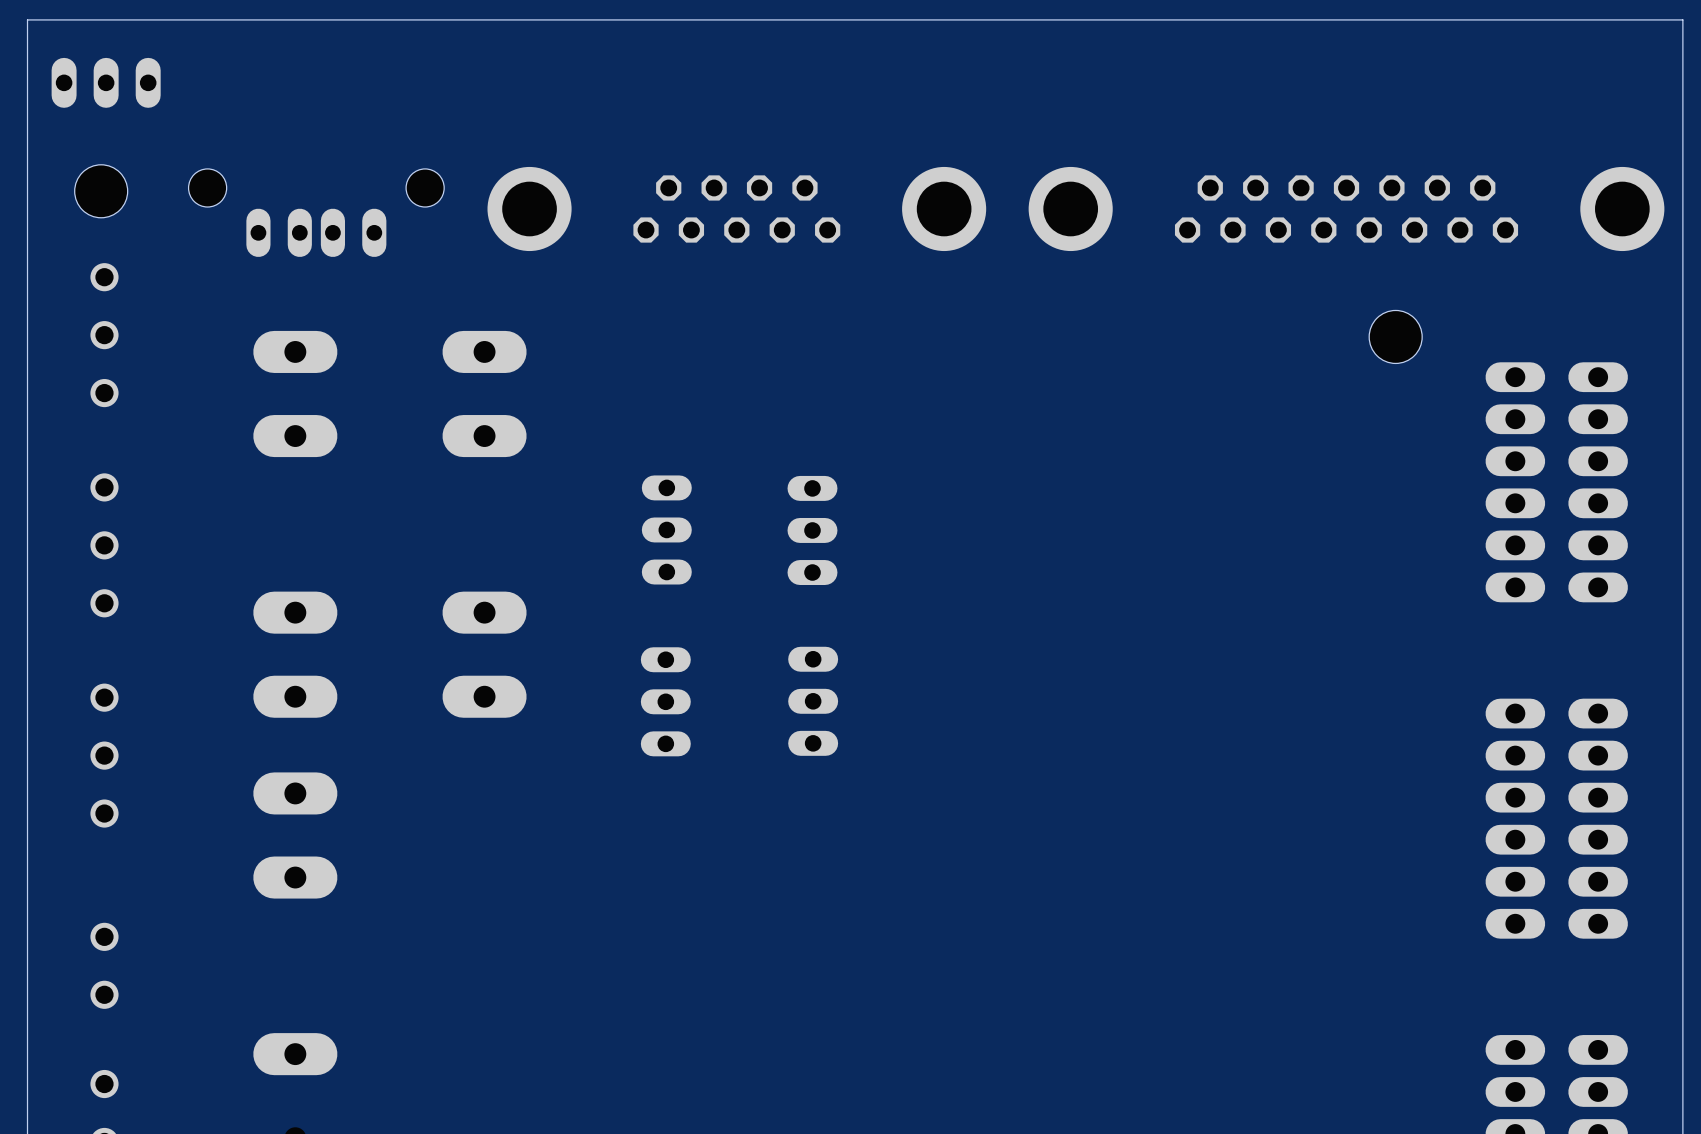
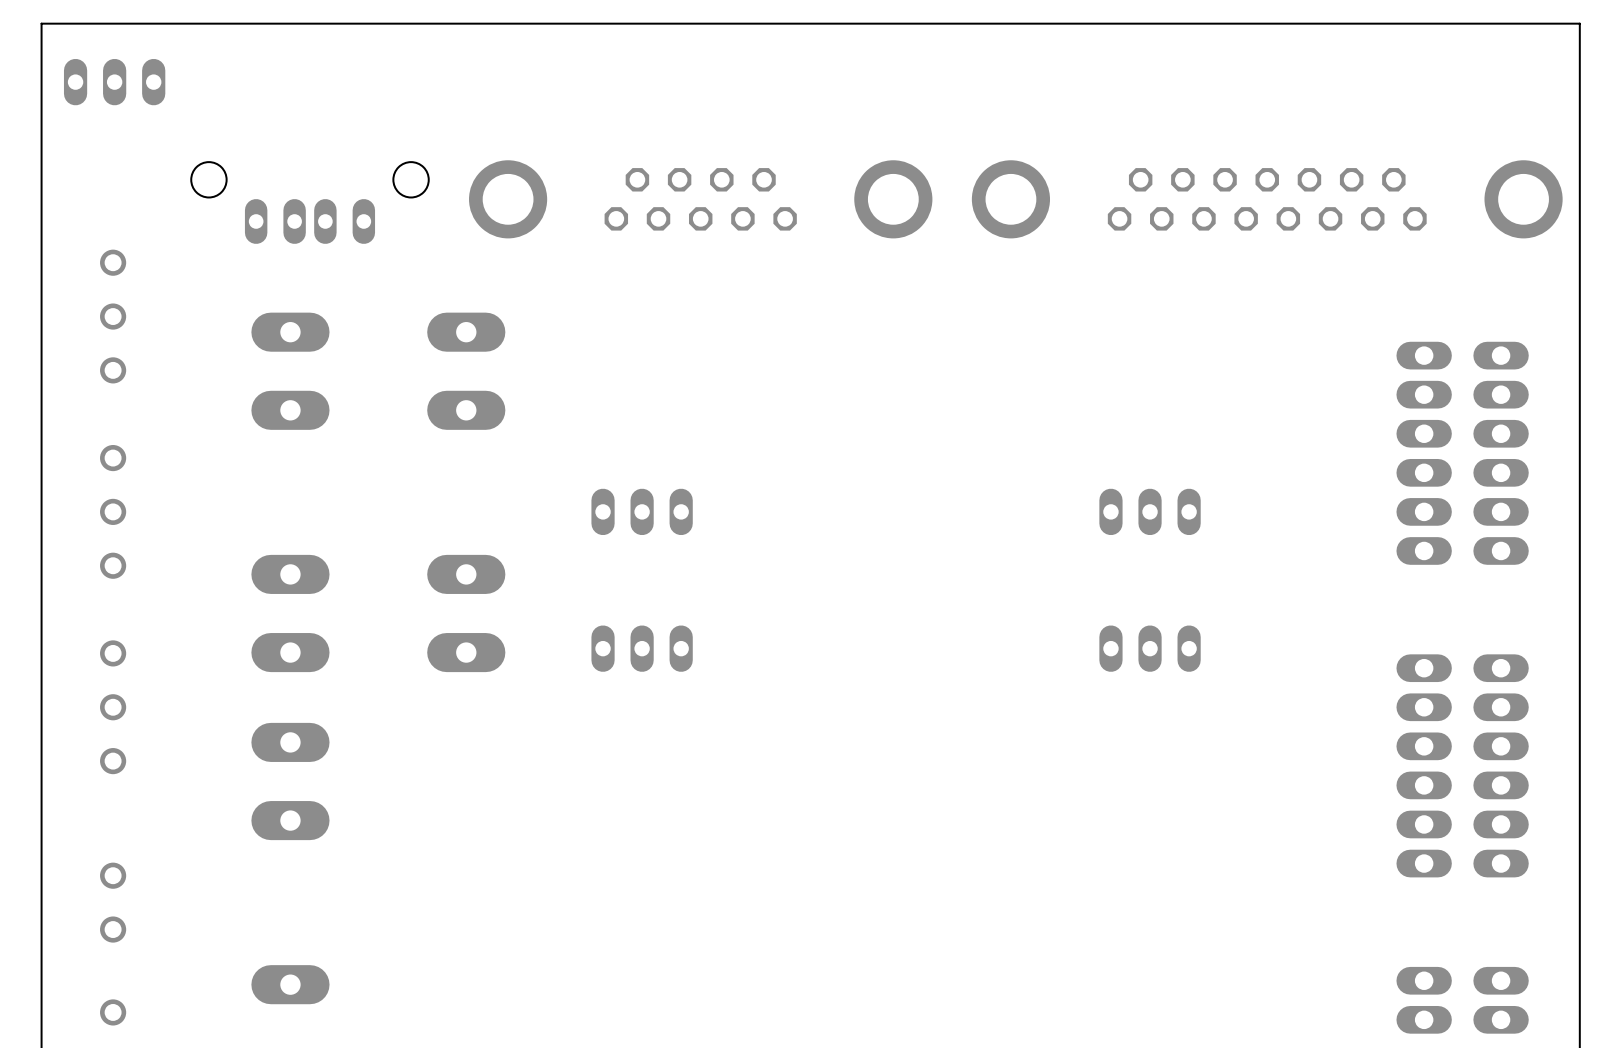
hole: (101, 191) -> none
hole: (1395, 336) -> none
part rotation: 0° (666, 529) -> 90° clockwise (642, 511)
part: (812, 530) -> none
part: none -> (1150, 511)
part: none -> (1150, 648)
part rotation: 0° (665, 701) -> 90° clockwise (642, 648)
part: (813, 701) -> none

